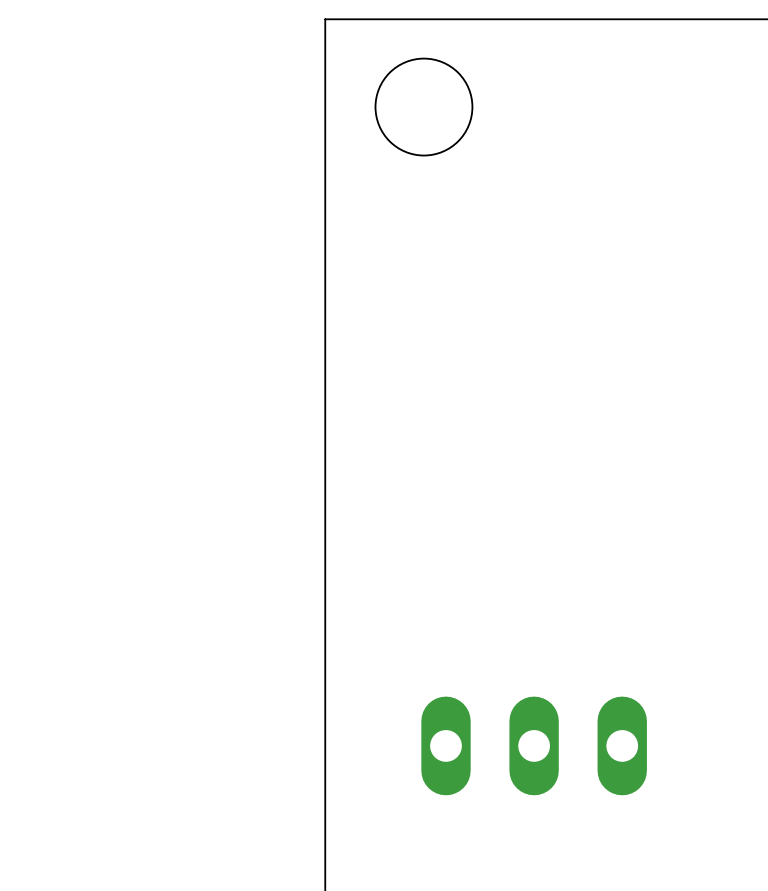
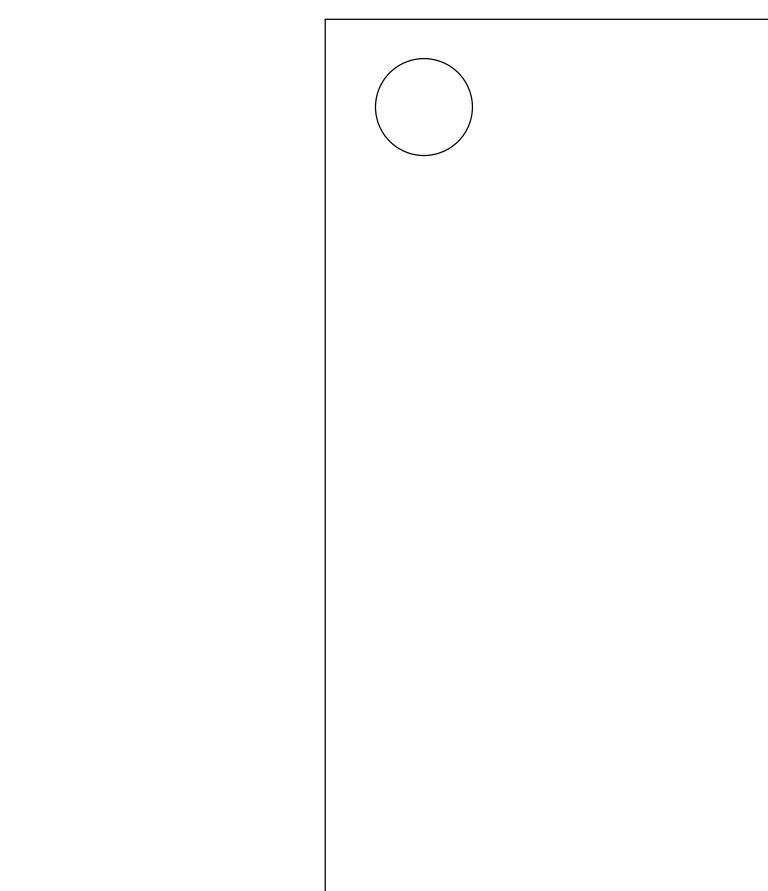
part: (534, 745) -> none

